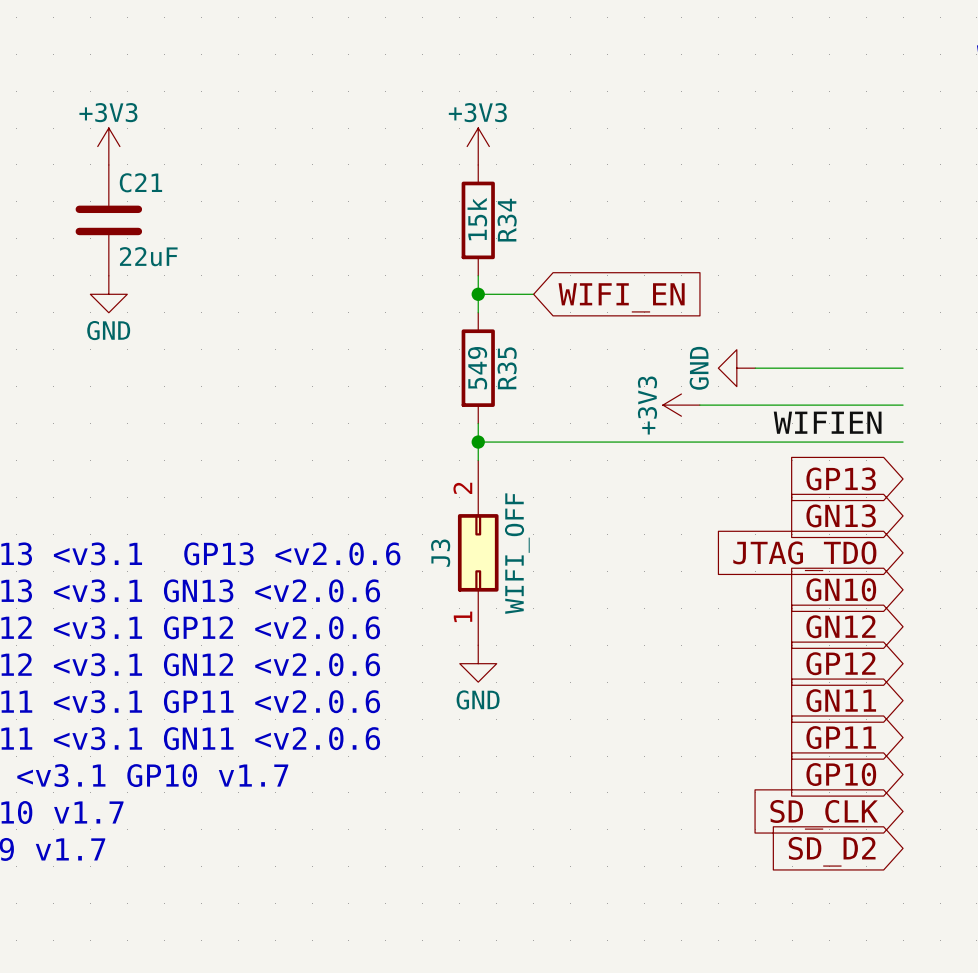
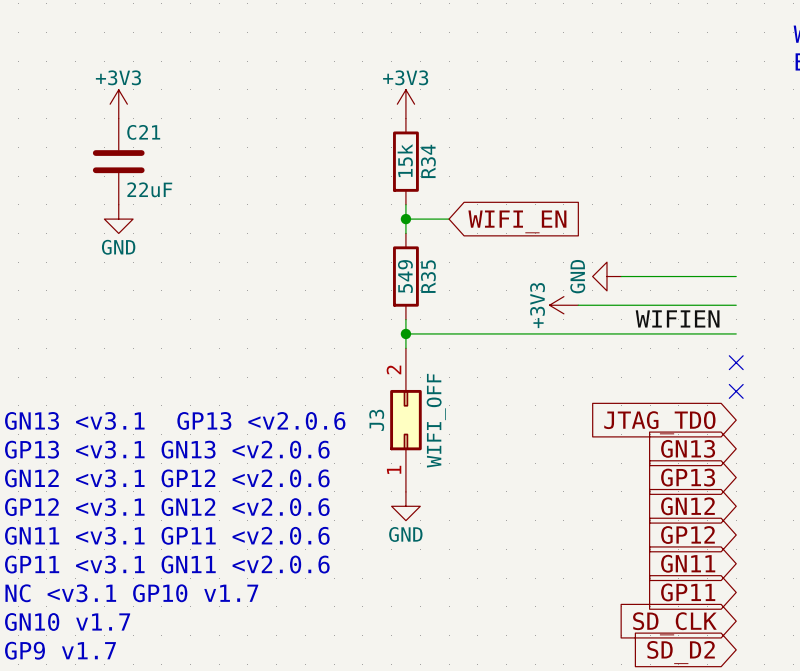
no-connect mark: none -> (736, 362)
global label: GP13 (841, 479) -> none
global label: GN13 (841, 515) -> none
no-connect mark: none -> (736, 391)
global label: GN10 (841, 589) -> GN13 (688, 448)
global label: GN12 (840, 626) -> GP13 (688, 477)
global label: GP12 (840, 663) -> GN12 (687, 506)
global label: GN11 (841, 700) -> GP12 (687, 535)
global label: GP11 (841, 737) -> GN11 (688, 563)
global label: GP10 (841, 774) -> GP11 (688, 592)

